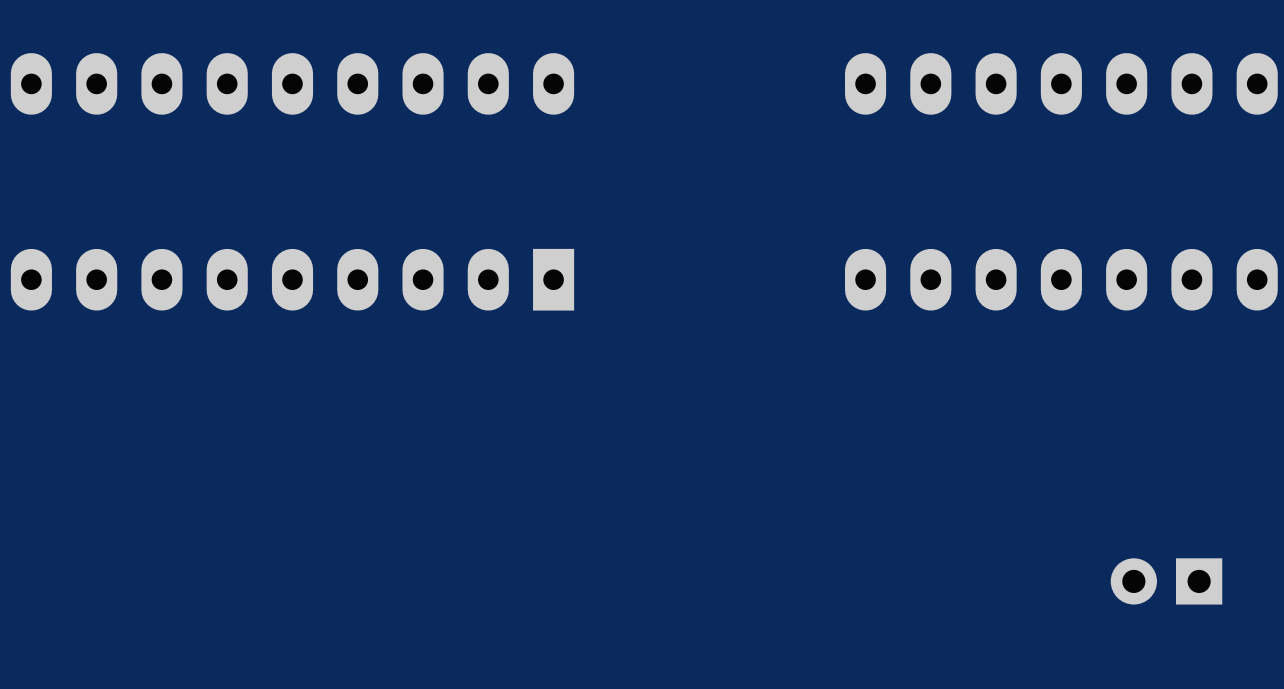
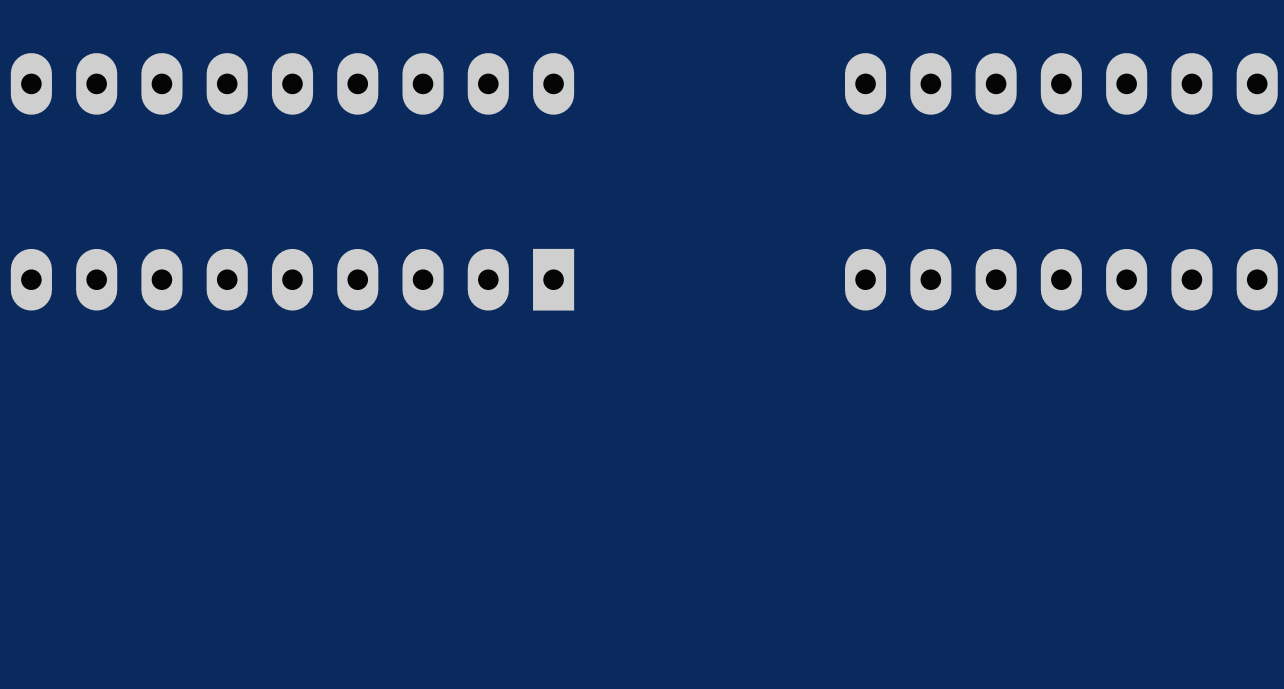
part: (1166, 581) -> none

